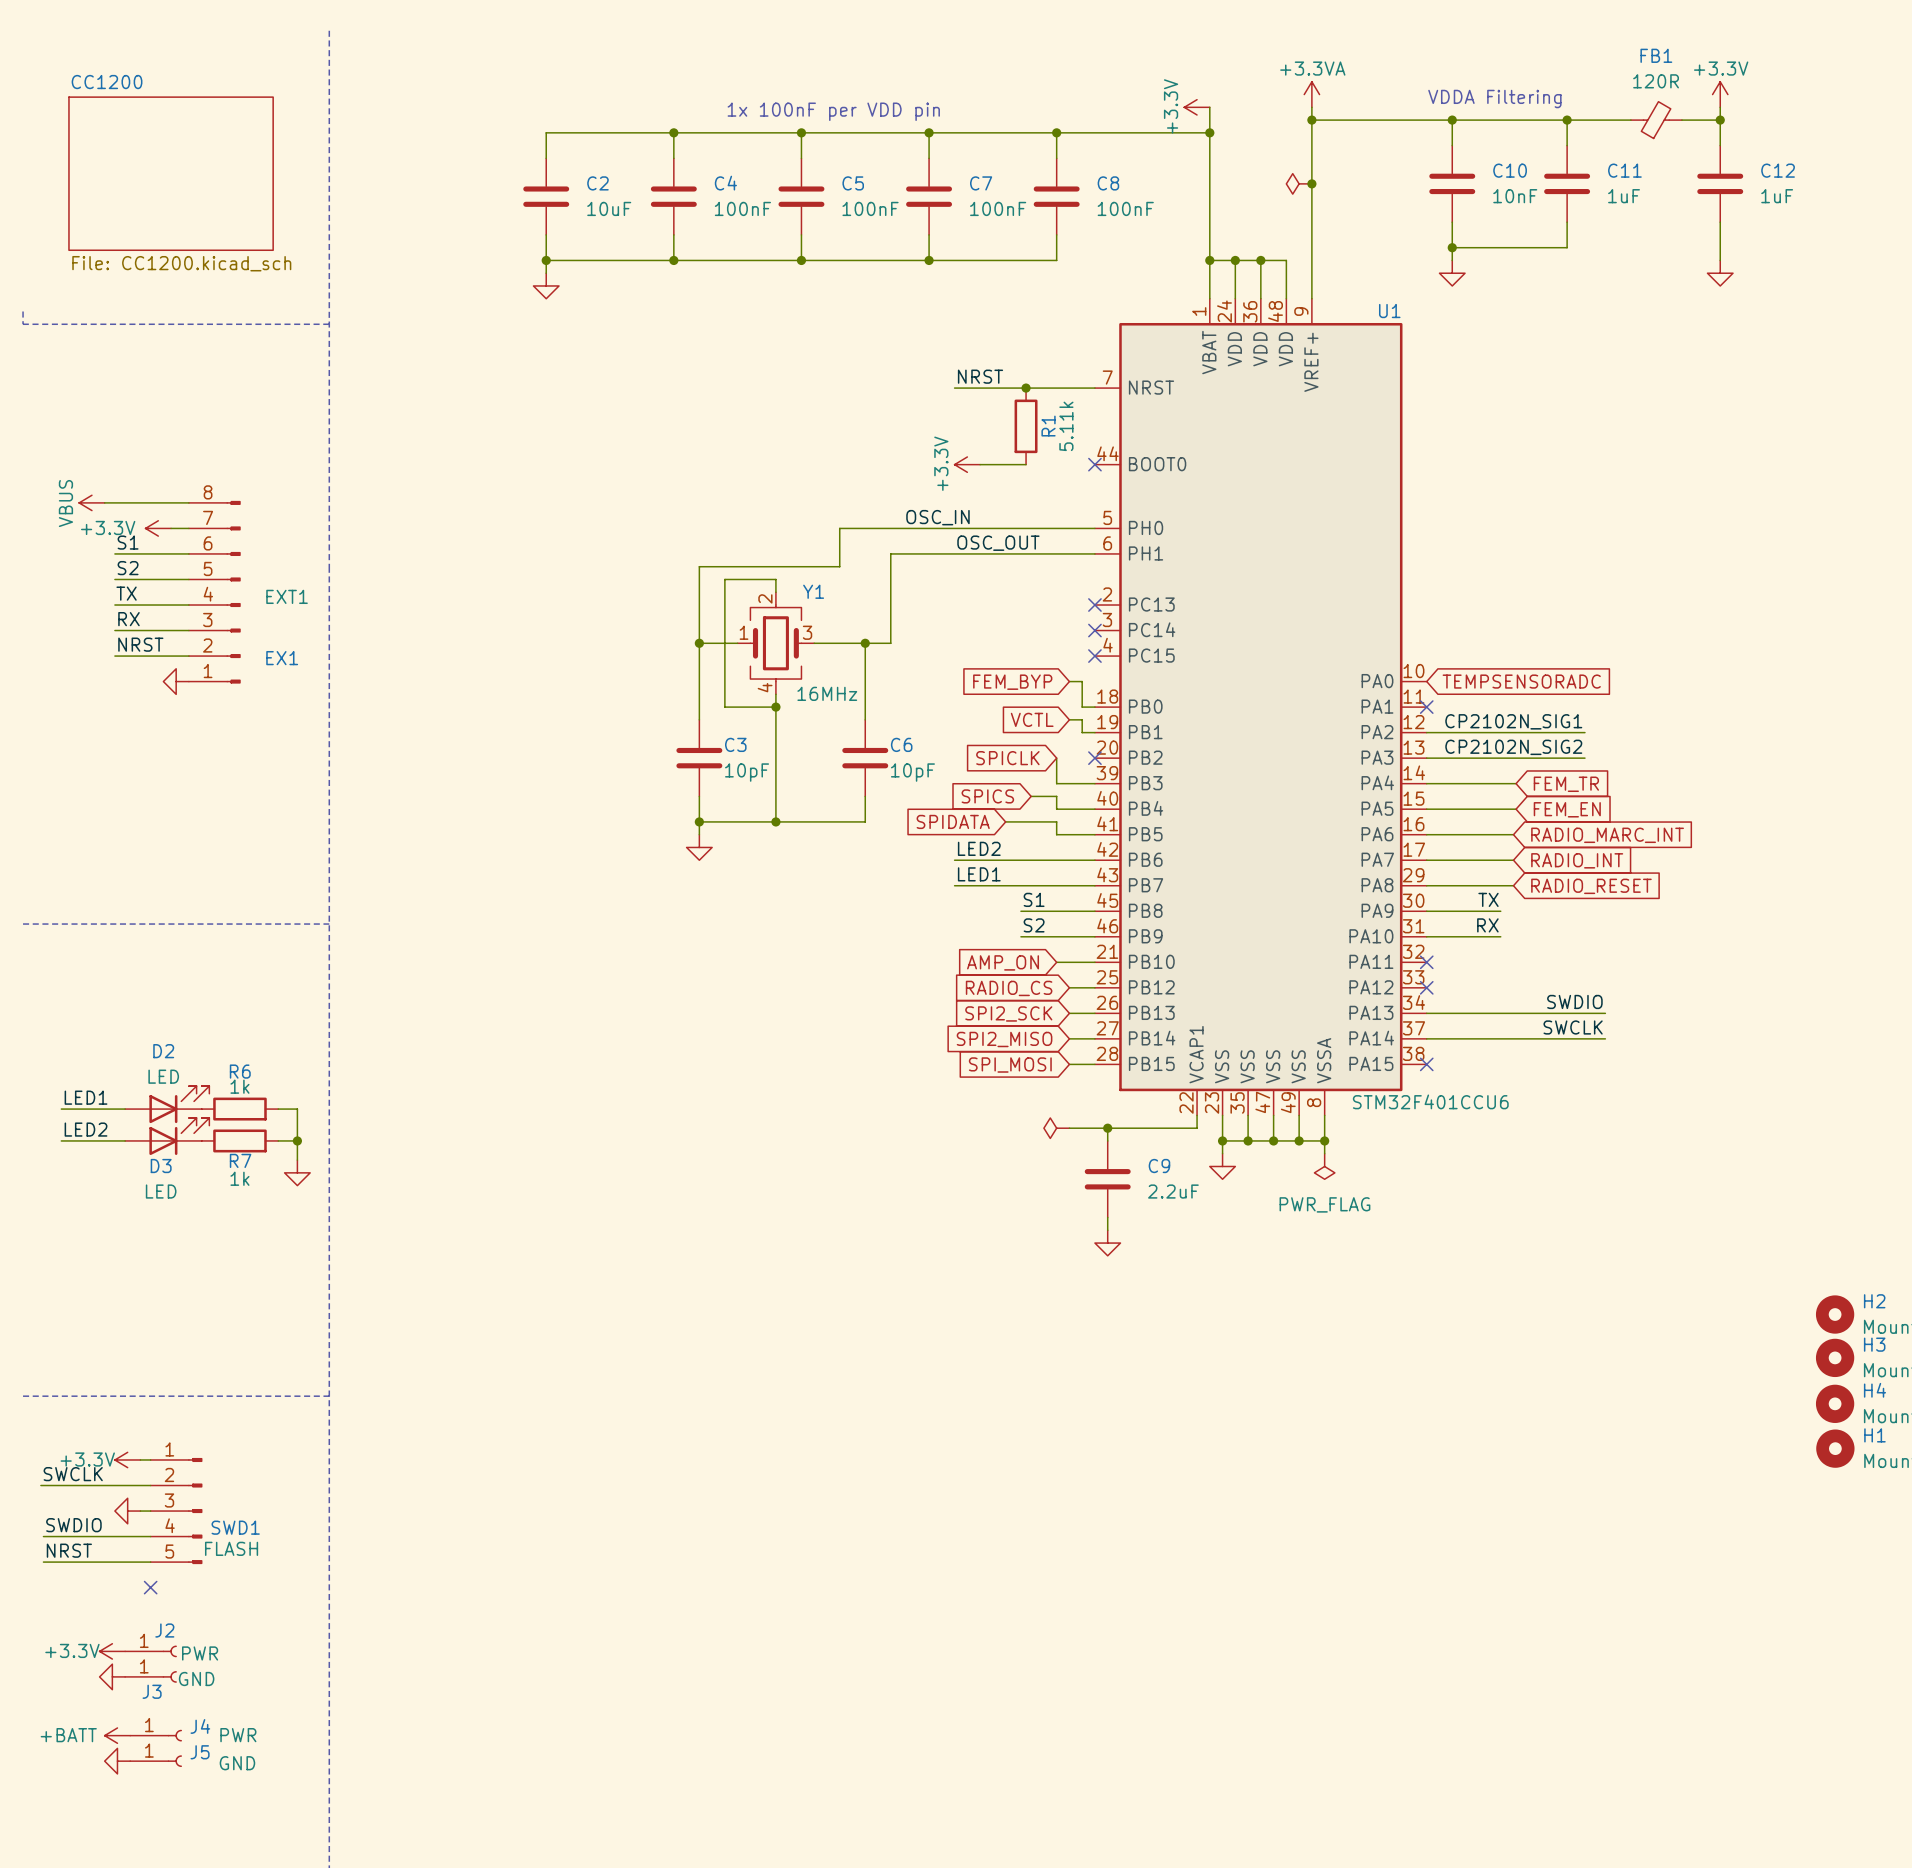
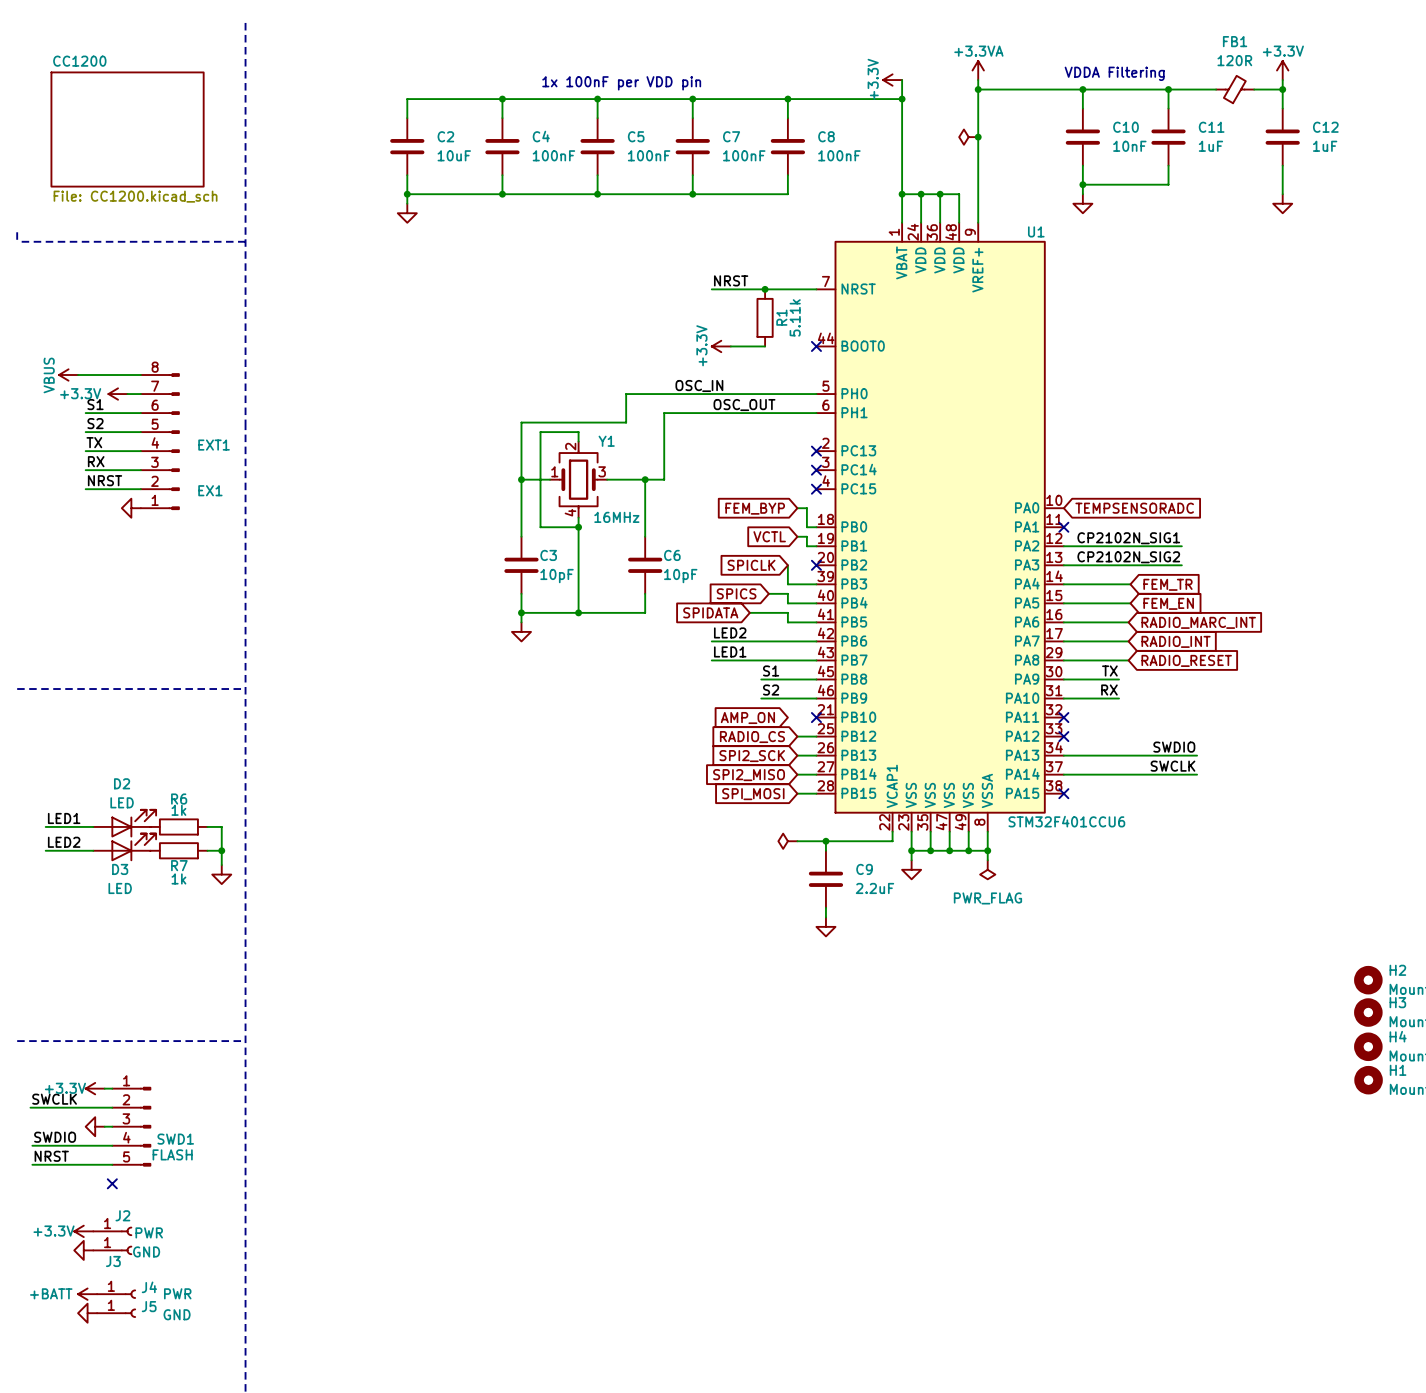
wire: (1056, 962) (1094, 962) -> none
no-connect mark: none -> (816, 717)

